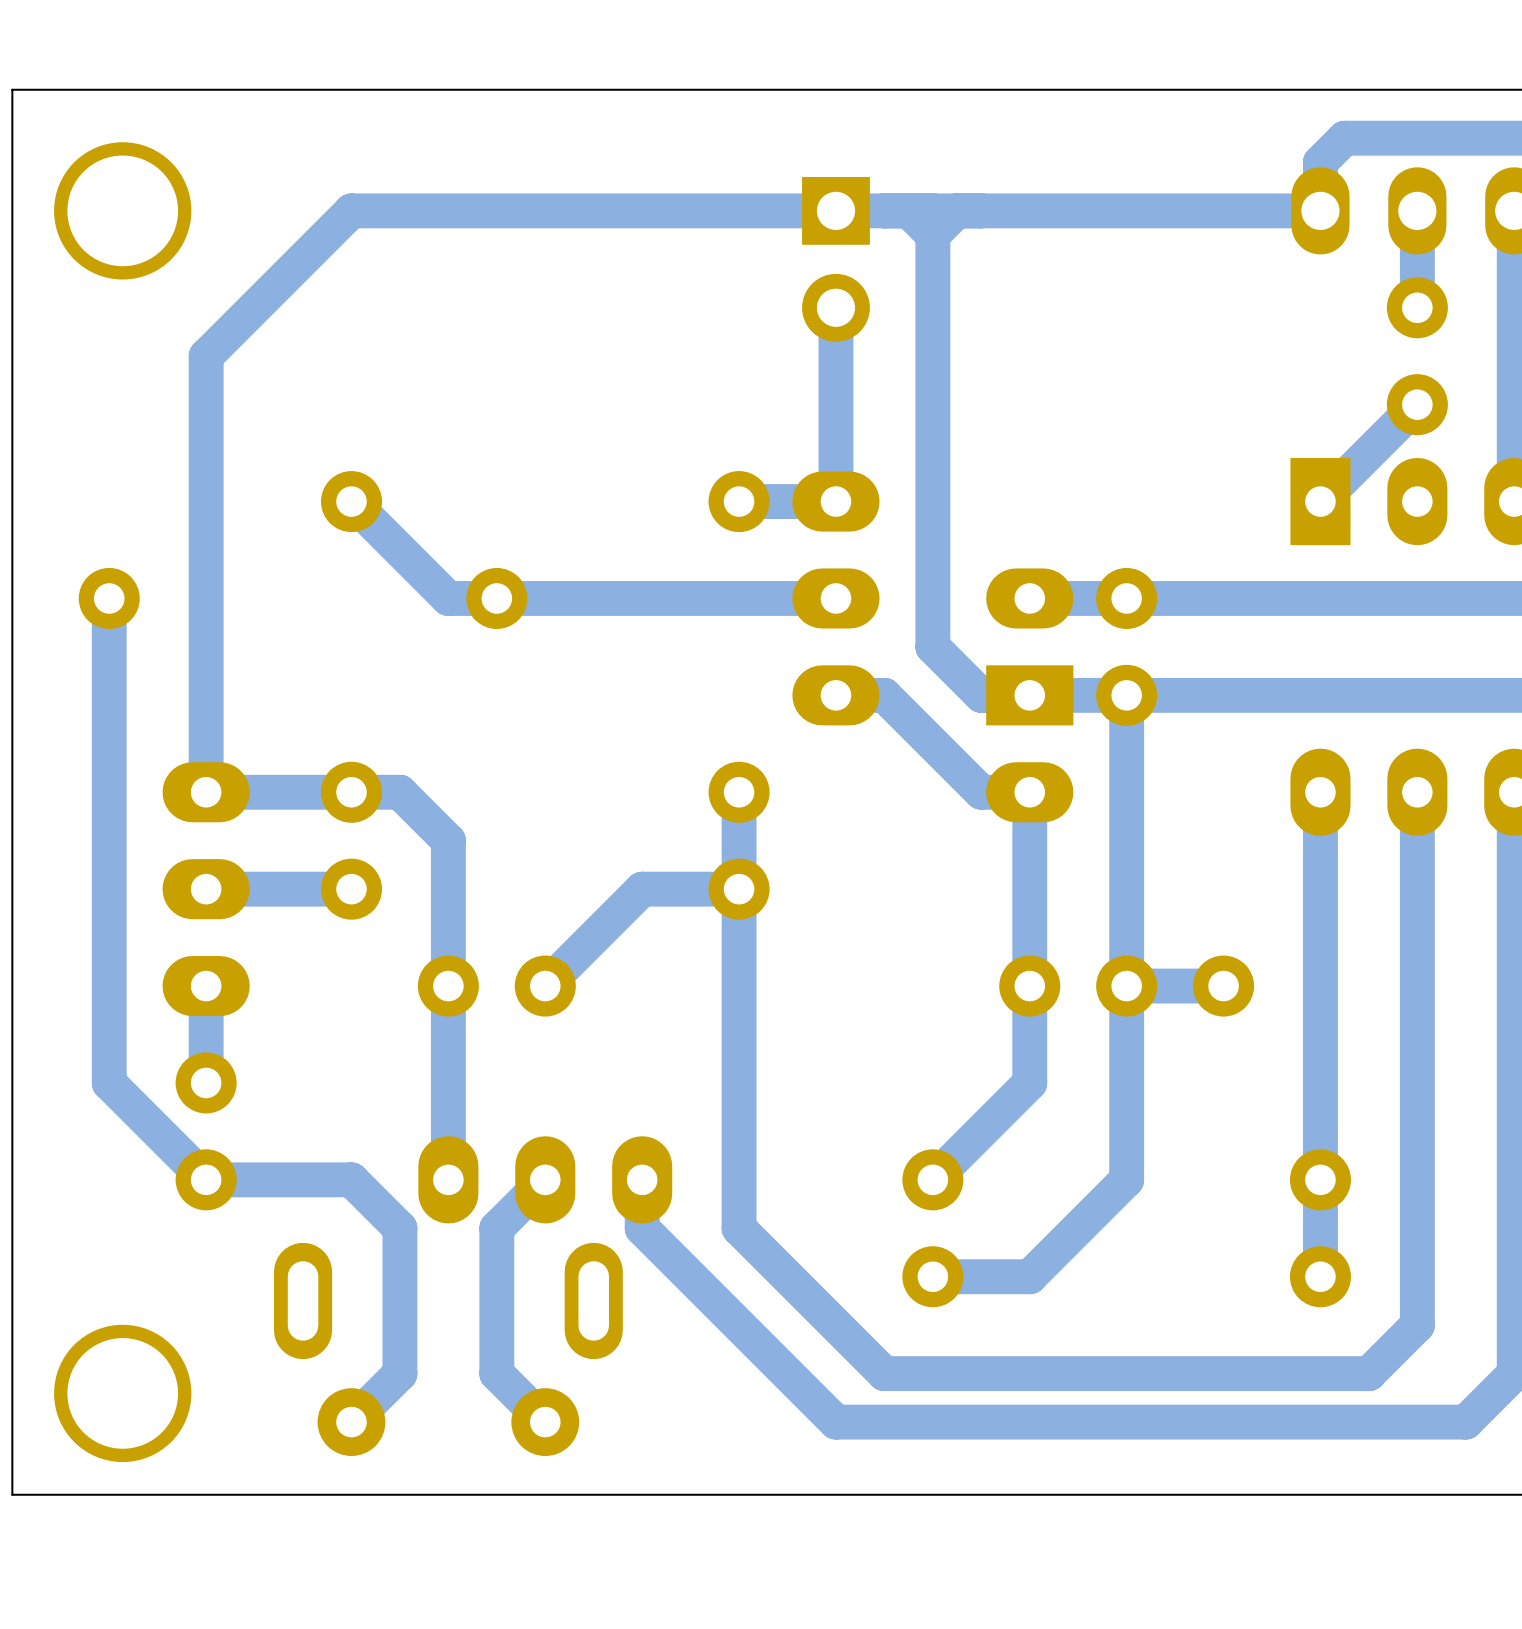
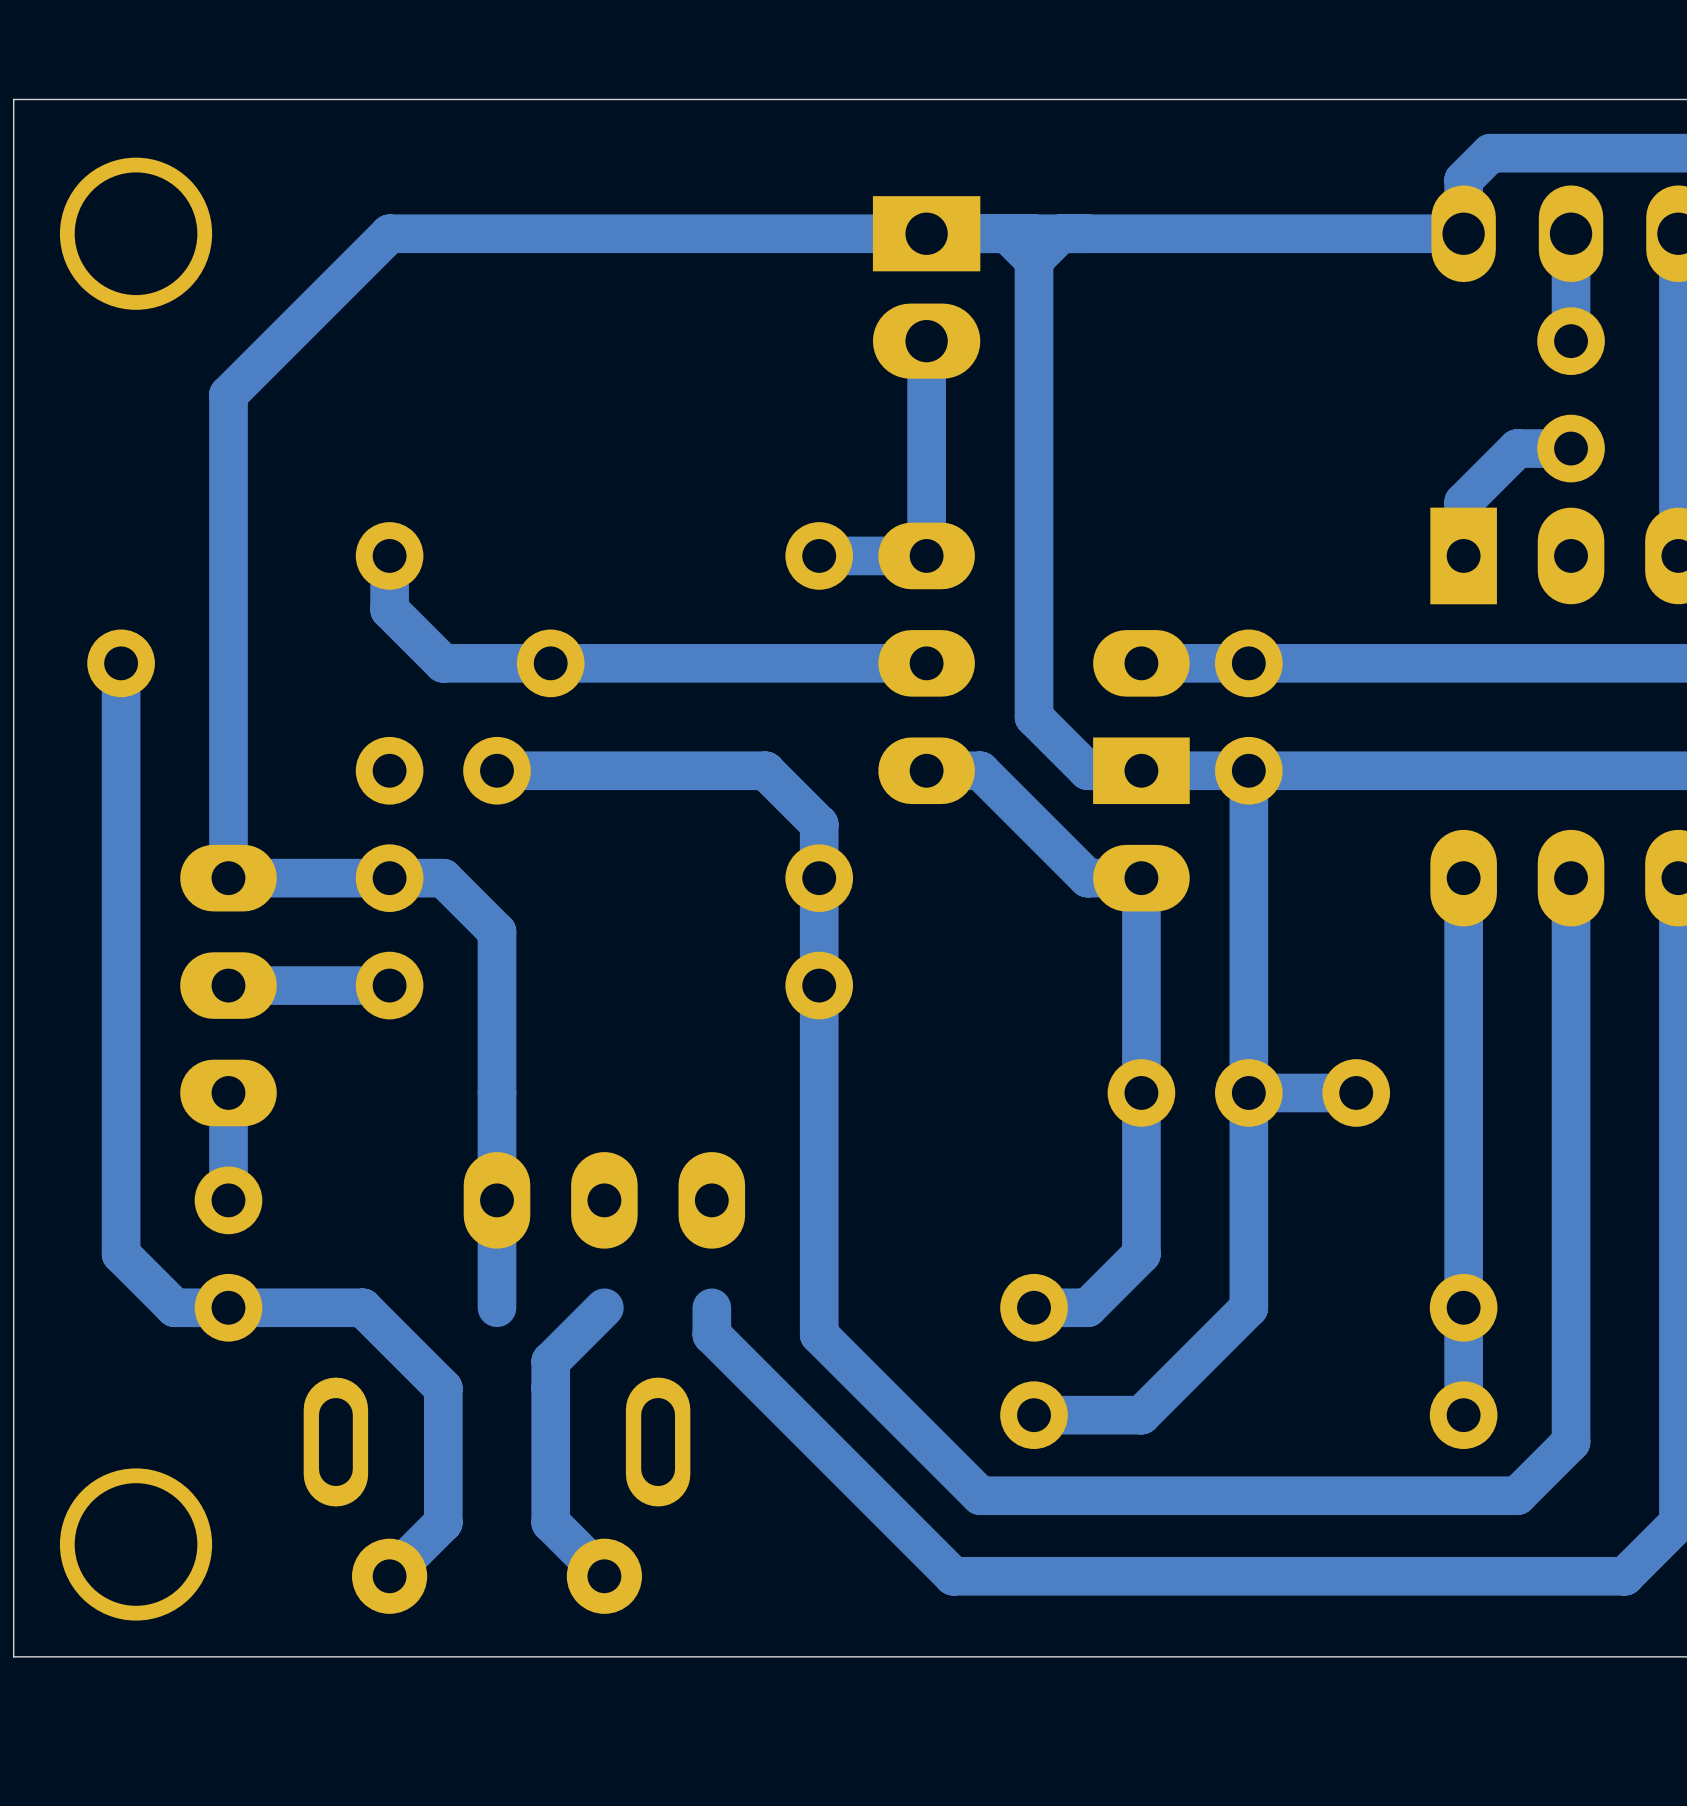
part footprint: [802, 176, 870, 342] -> [872, 196, 981, 379]
track: (1417, 404) (1320, 501) -> (1571, 448) (1517, 448) (1463, 502) (1463, 555)
track: (351, 501) (448, 598) -> (389, 555) (389, 609) (443, 663) (497, 663)
track: none -> (497, 770) (765, 770) (819, 824) (819, 878)
track: (739, 889) (642, 889) (545, 986) -> none
part position: (496, 986) -> (443, 770)
track: (109, 1082) (206, 1179) -> (121, 1200) (121, 1254) (174, 1307) (228, 1307)
track: (1029, 1082) (932, 1179) -> (1141, 1200) (1141, 1254) (1087, 1307) (1034, 1307)
track: (327, 1179) (351, 1179) (399, 1228) (399, 1252) -> (362, 1307) (443, 1388)
part position: (545, 1179) -> (604, 1200)
track: (642, 1204) (642, 1228) (835, 1422) (860, 1422) -> (711, 1334) (953, 1576)
track: (739, 1204) (739, 1228) (884, 1373) (1368, 1373) (1417, 1325) (1417, 1300) -> (819, 1334) (980, 1495) (1517, 1495) (1571, 1442)

